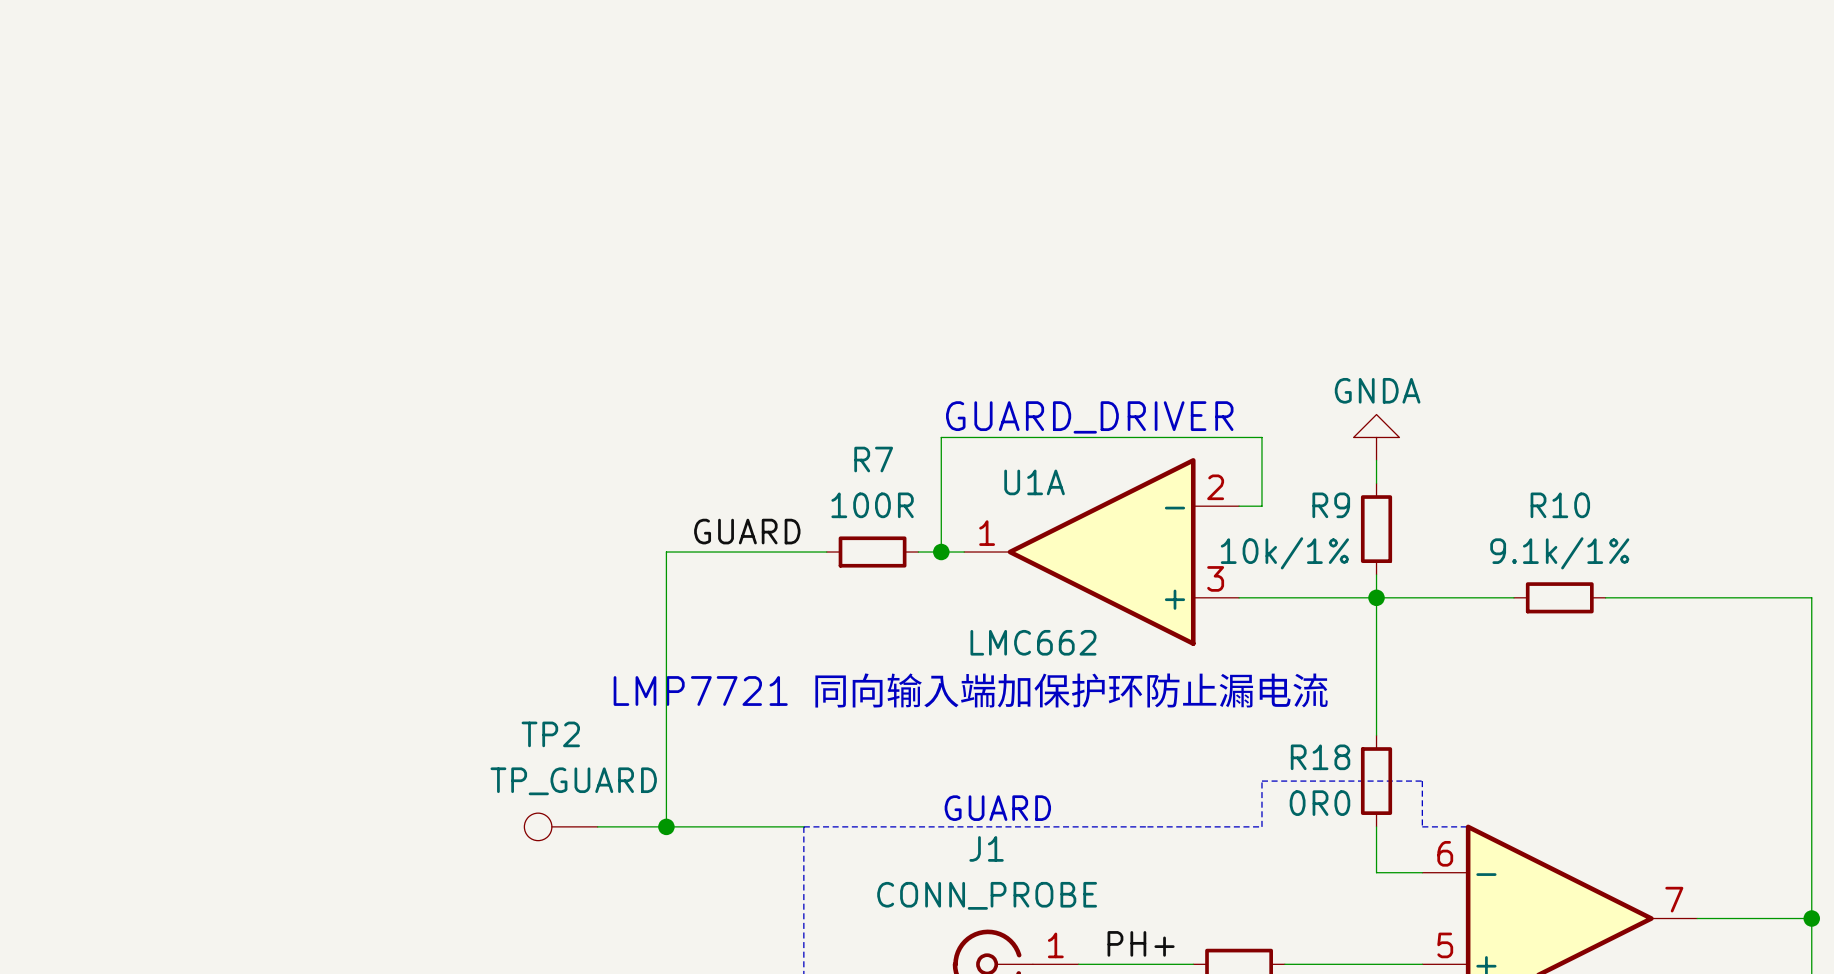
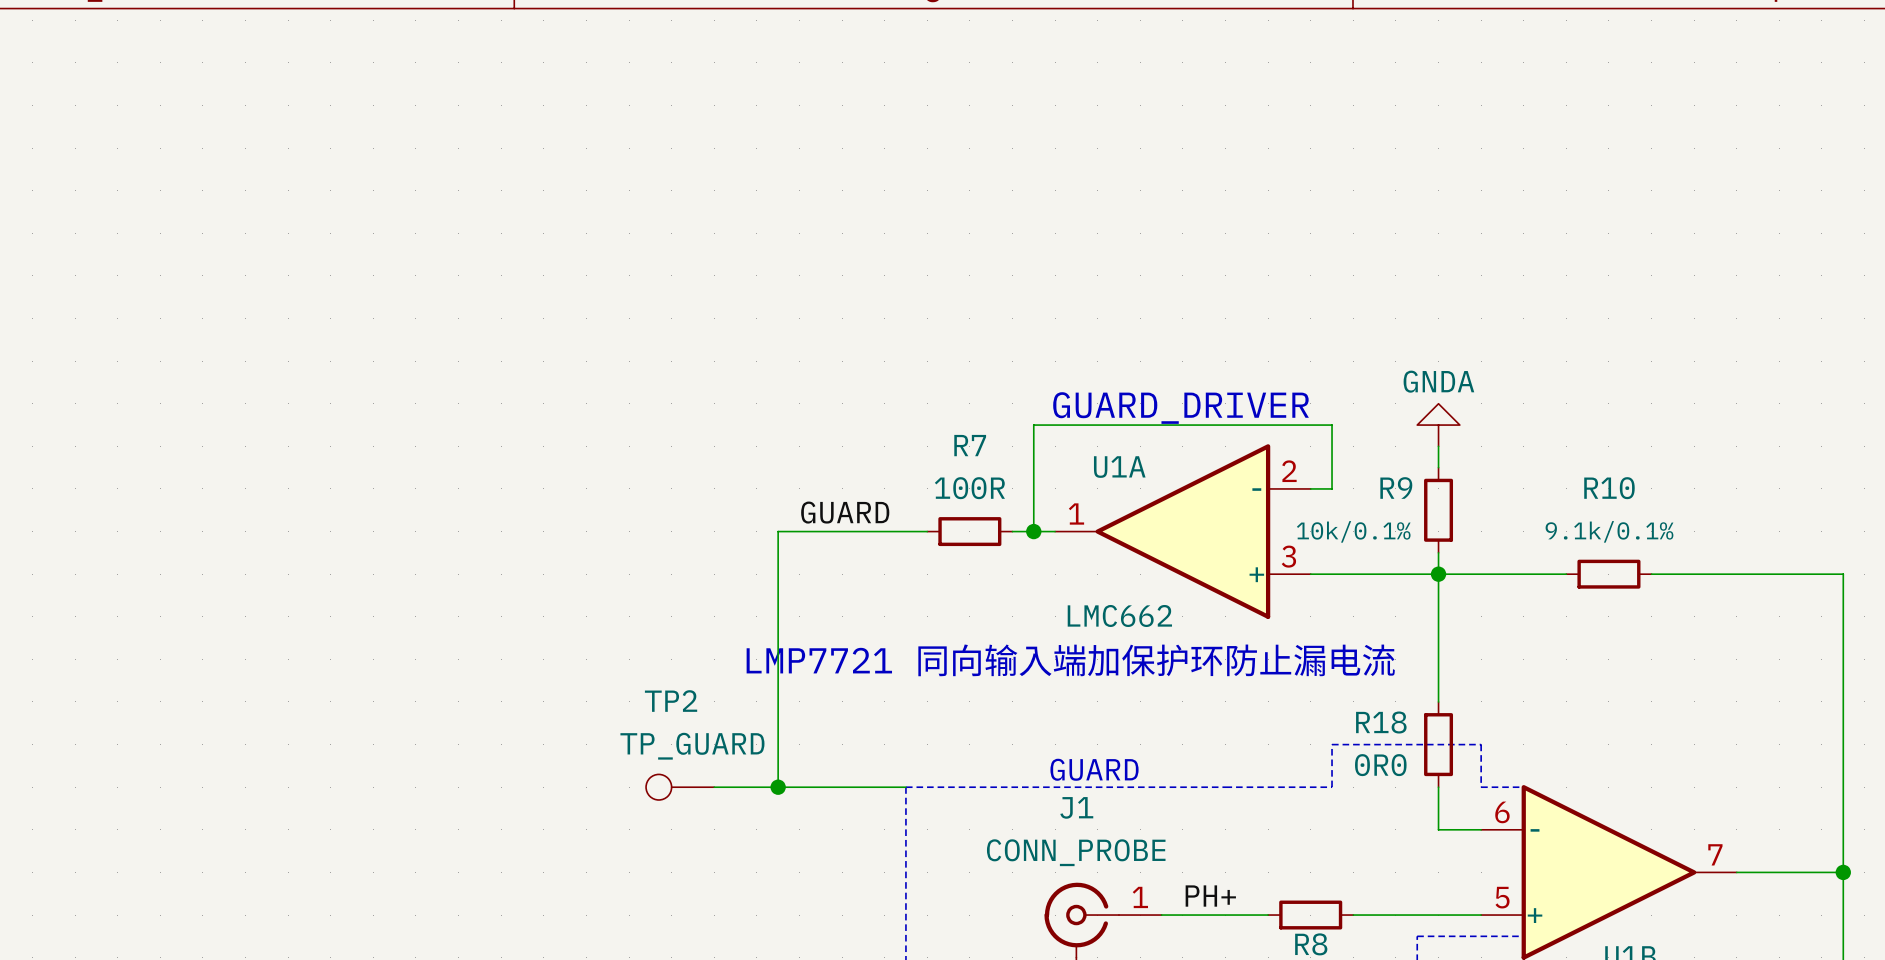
R9 value: 10k/1% (1284, 553) -> 10k/0.1% (1353, 531)
R10 value: 9.1k/1% (1559, 553) -> 9.1k/0.1% (1609, 531)

